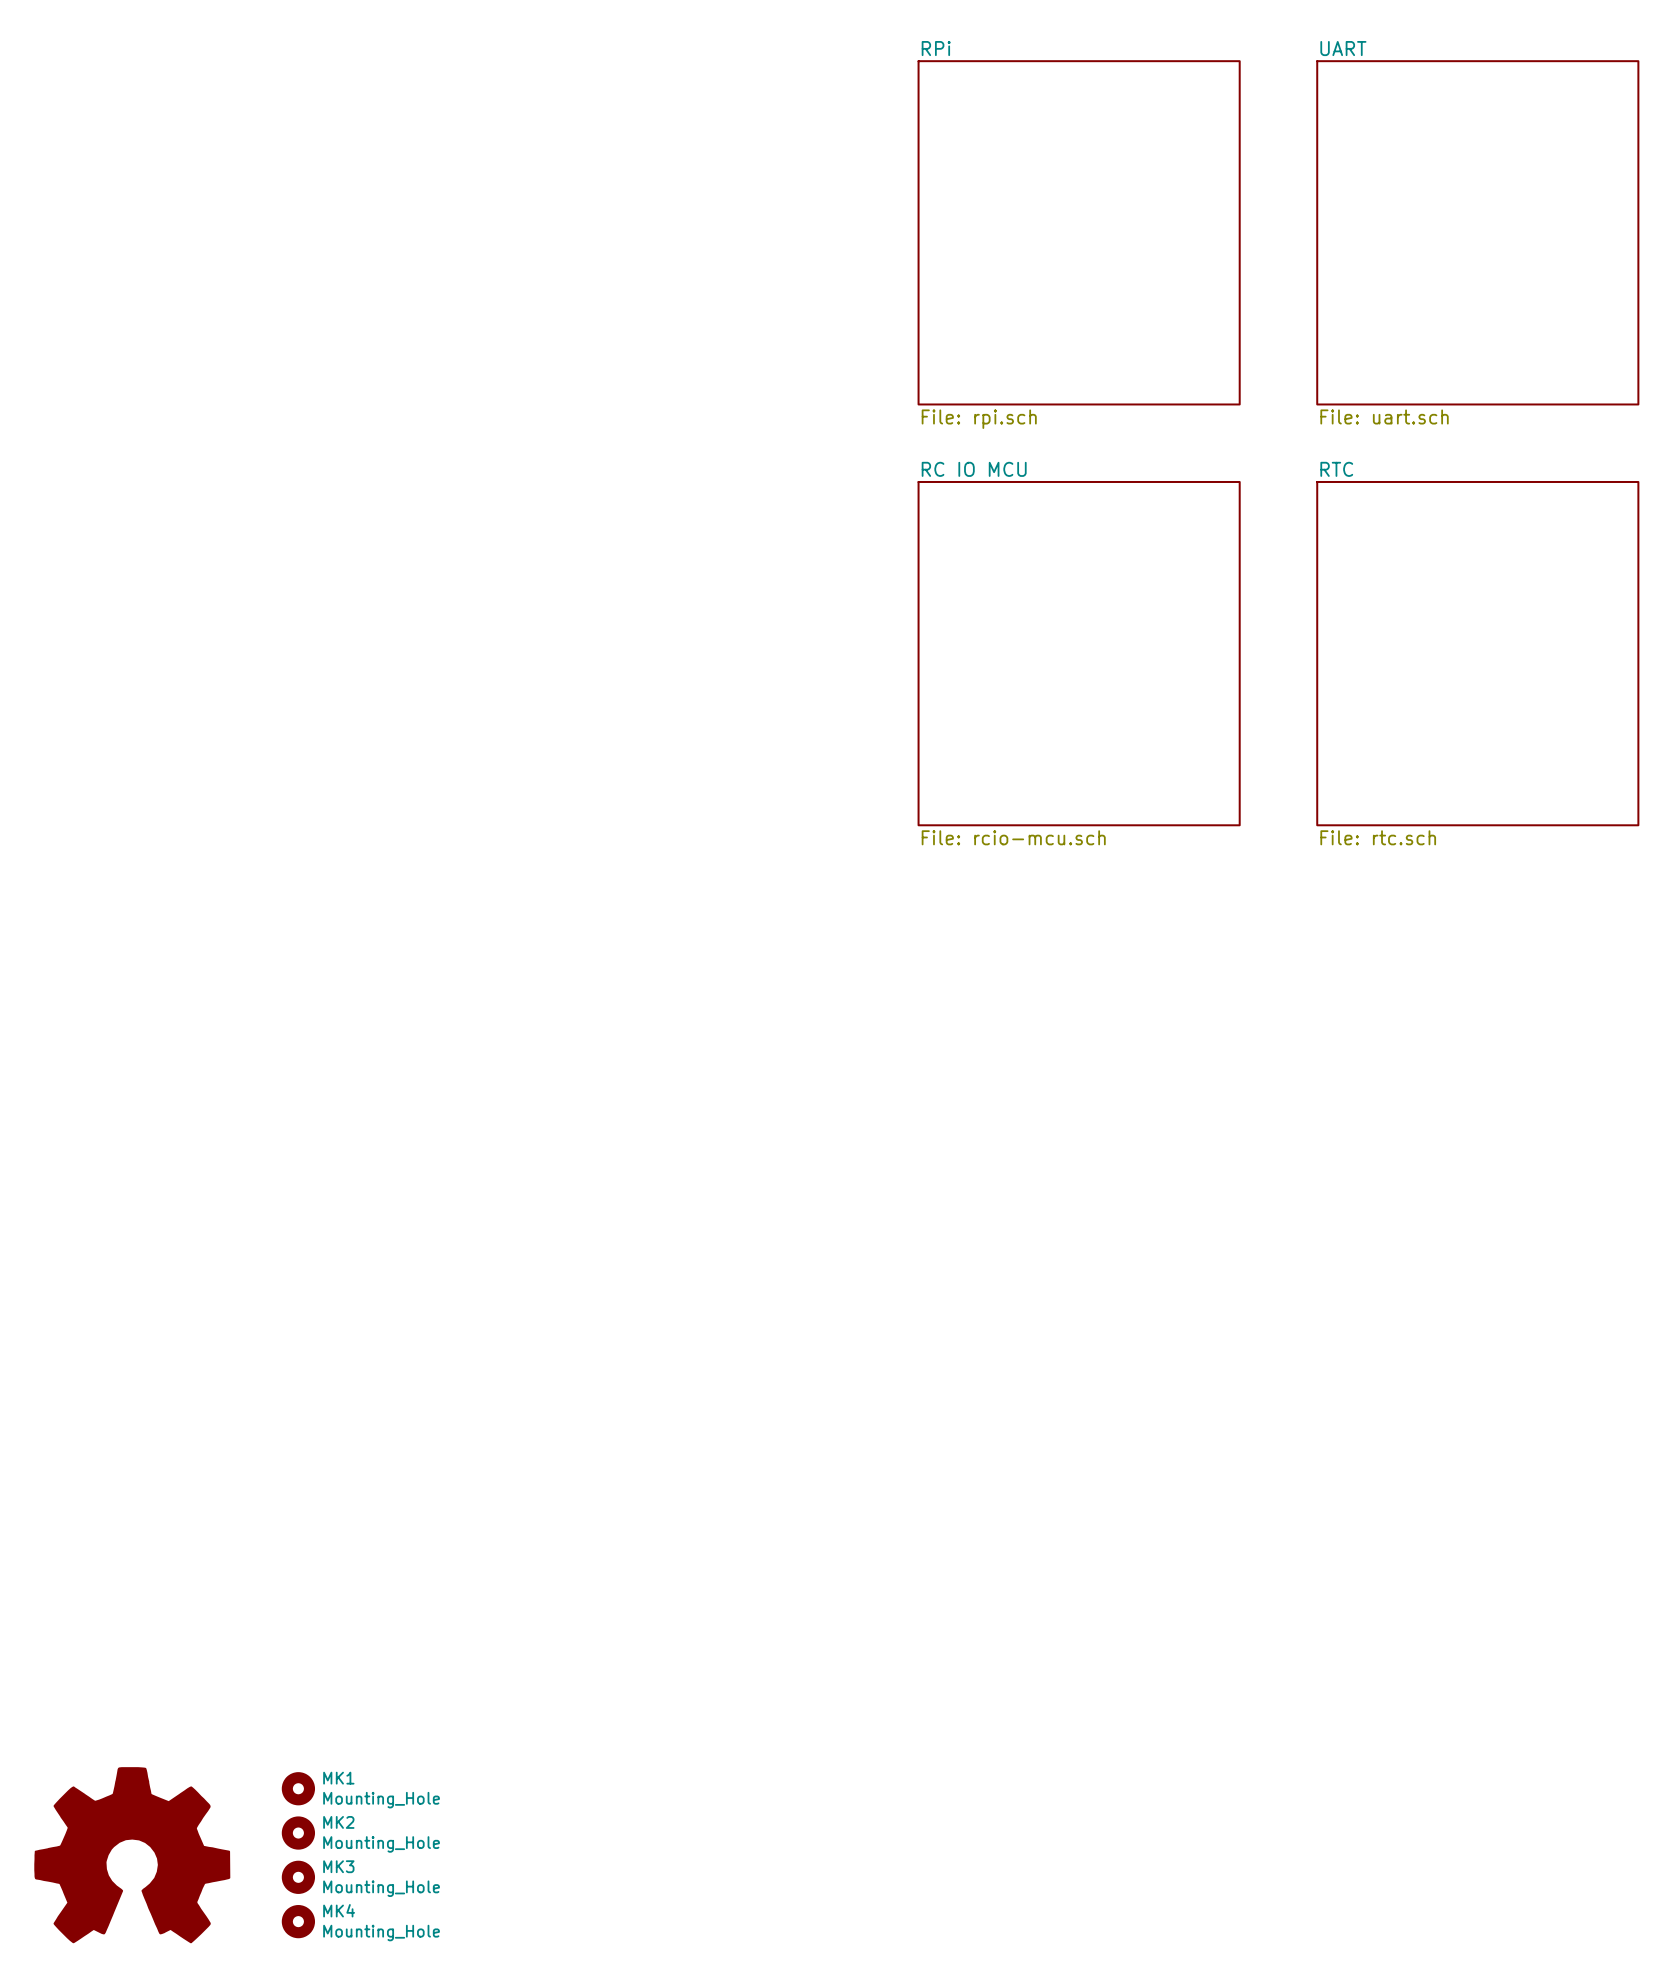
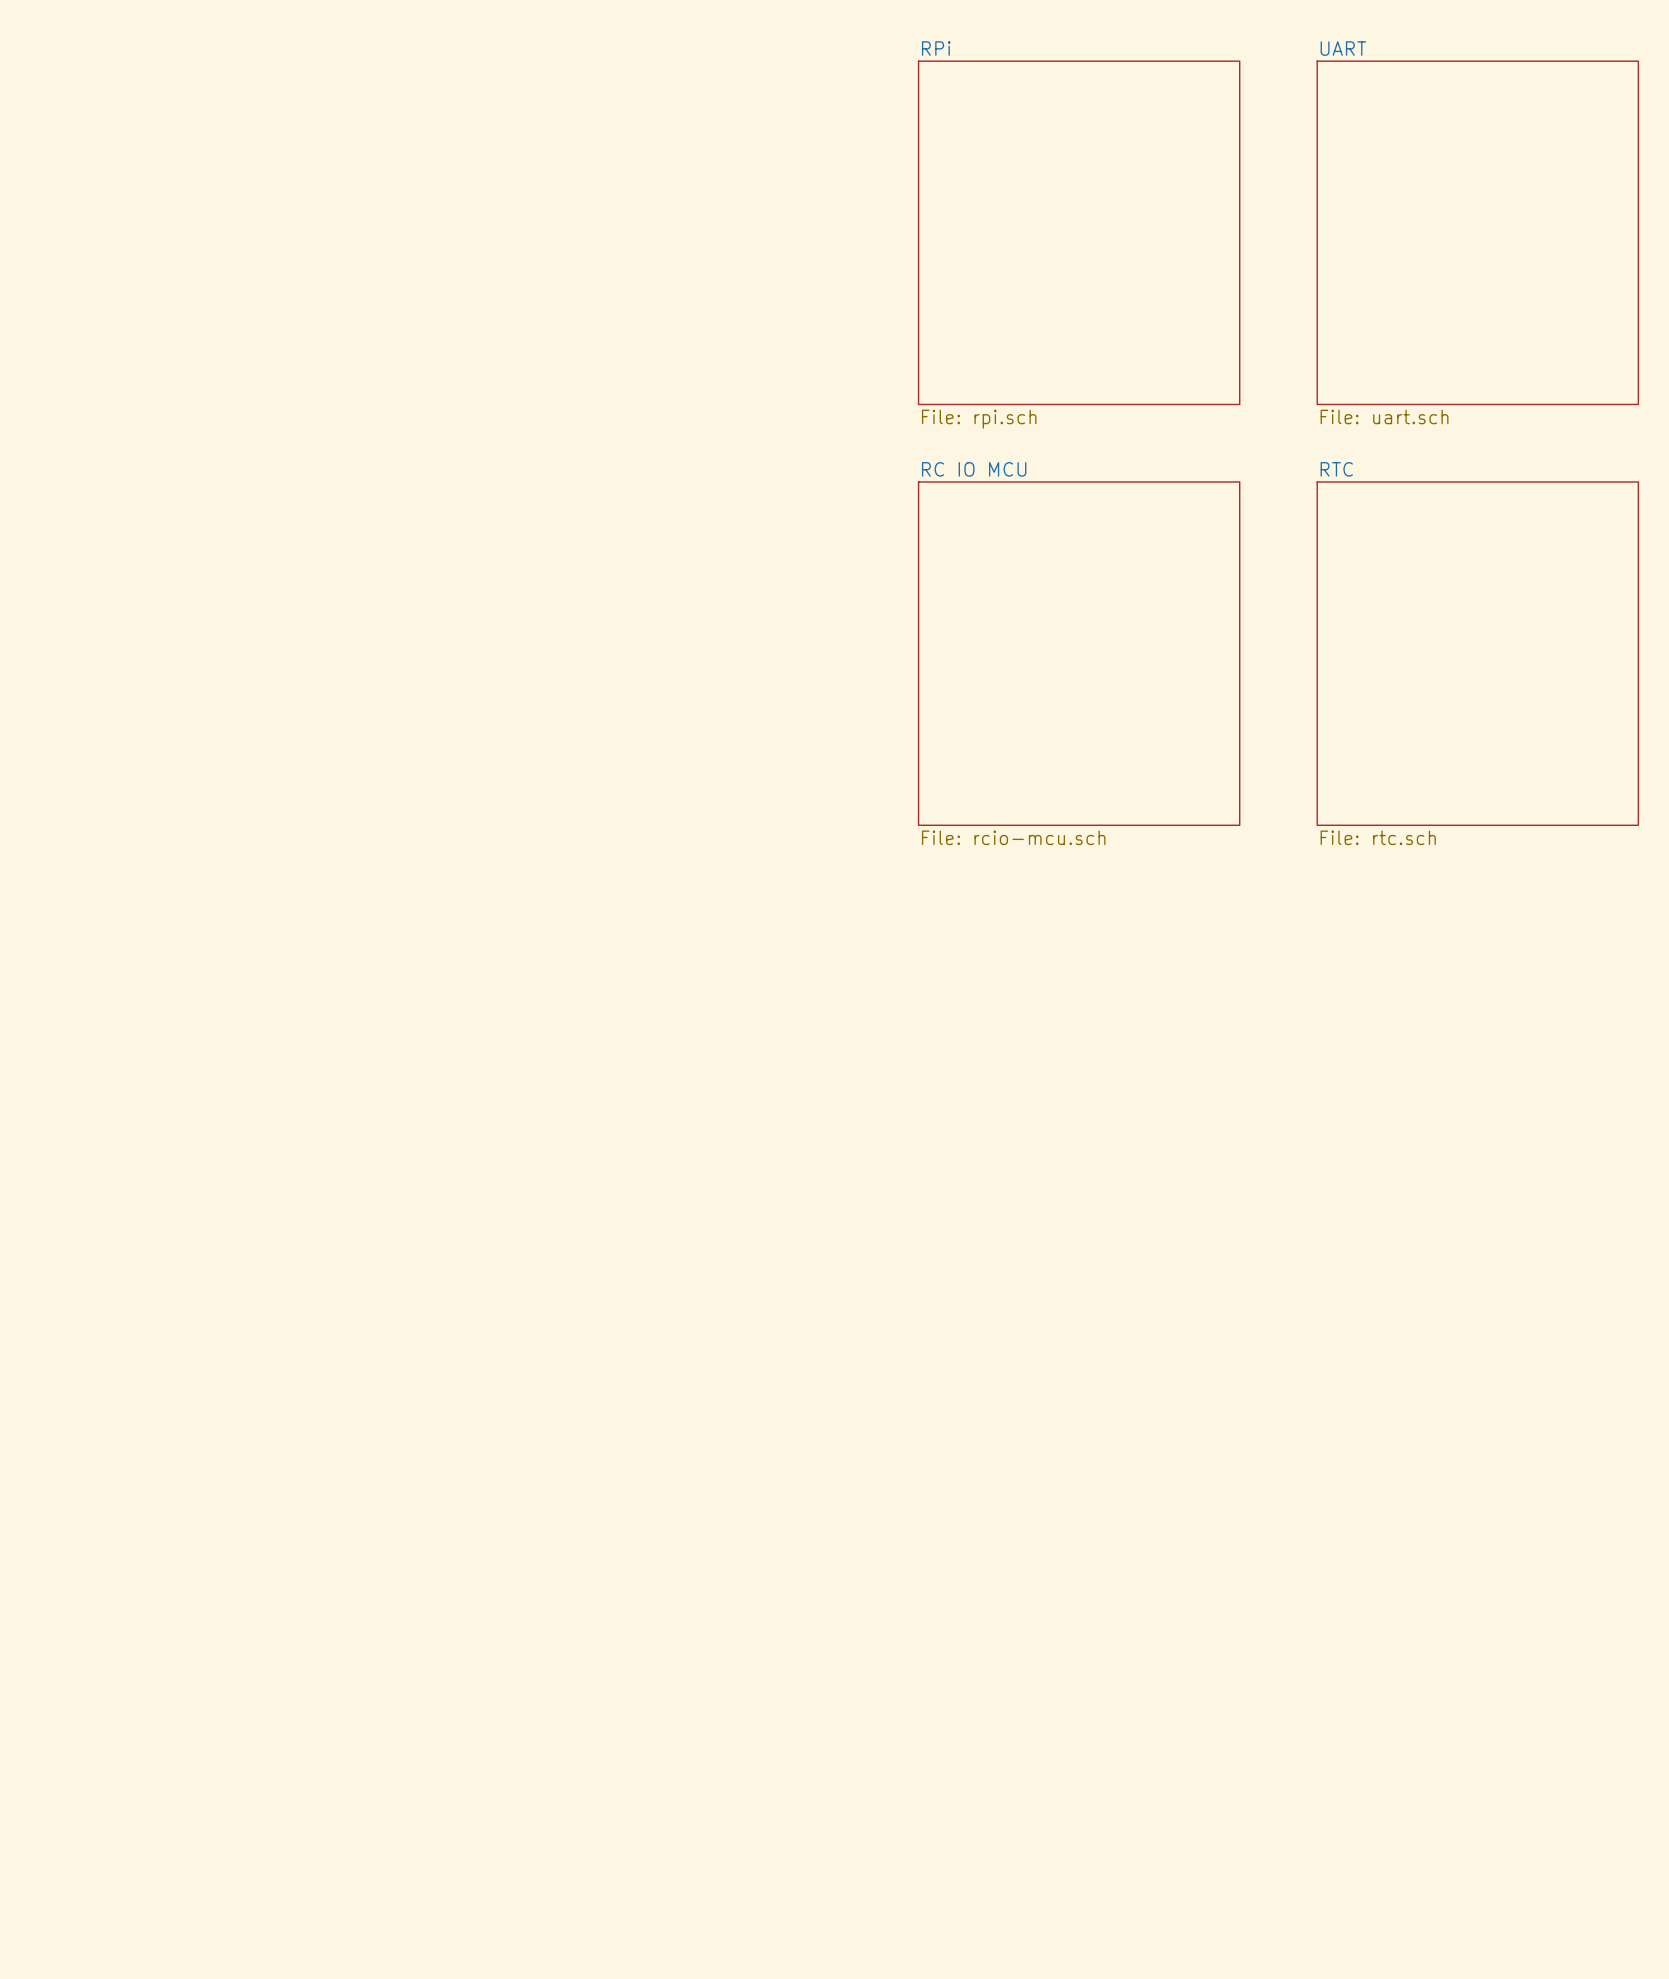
MK1: Mounting_Hole (298, 1788) -> none
MK2: Mounting_Hole (298, 1833) -> none
power symbol: (132, 1855) -> none
MK3: Mounting_Hole (298, 1877) -> none
MK4: Mounting_Hole (298, 1921) -> none

